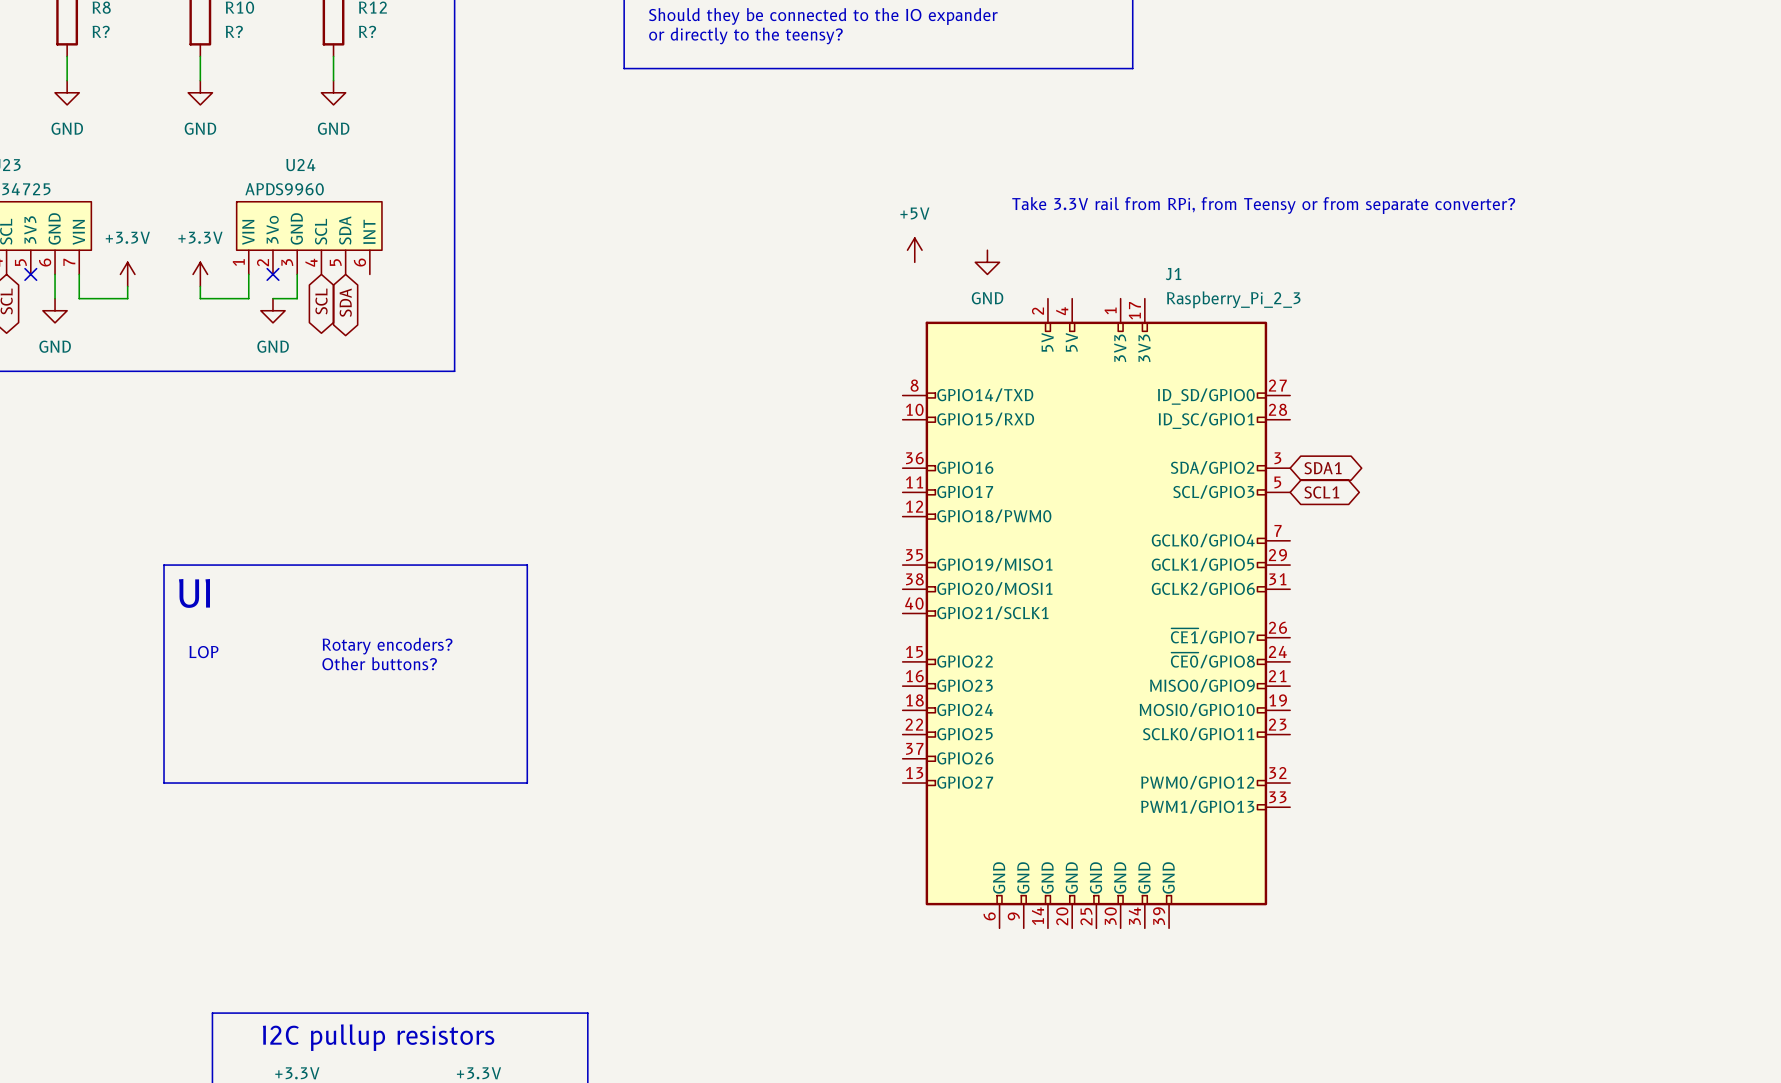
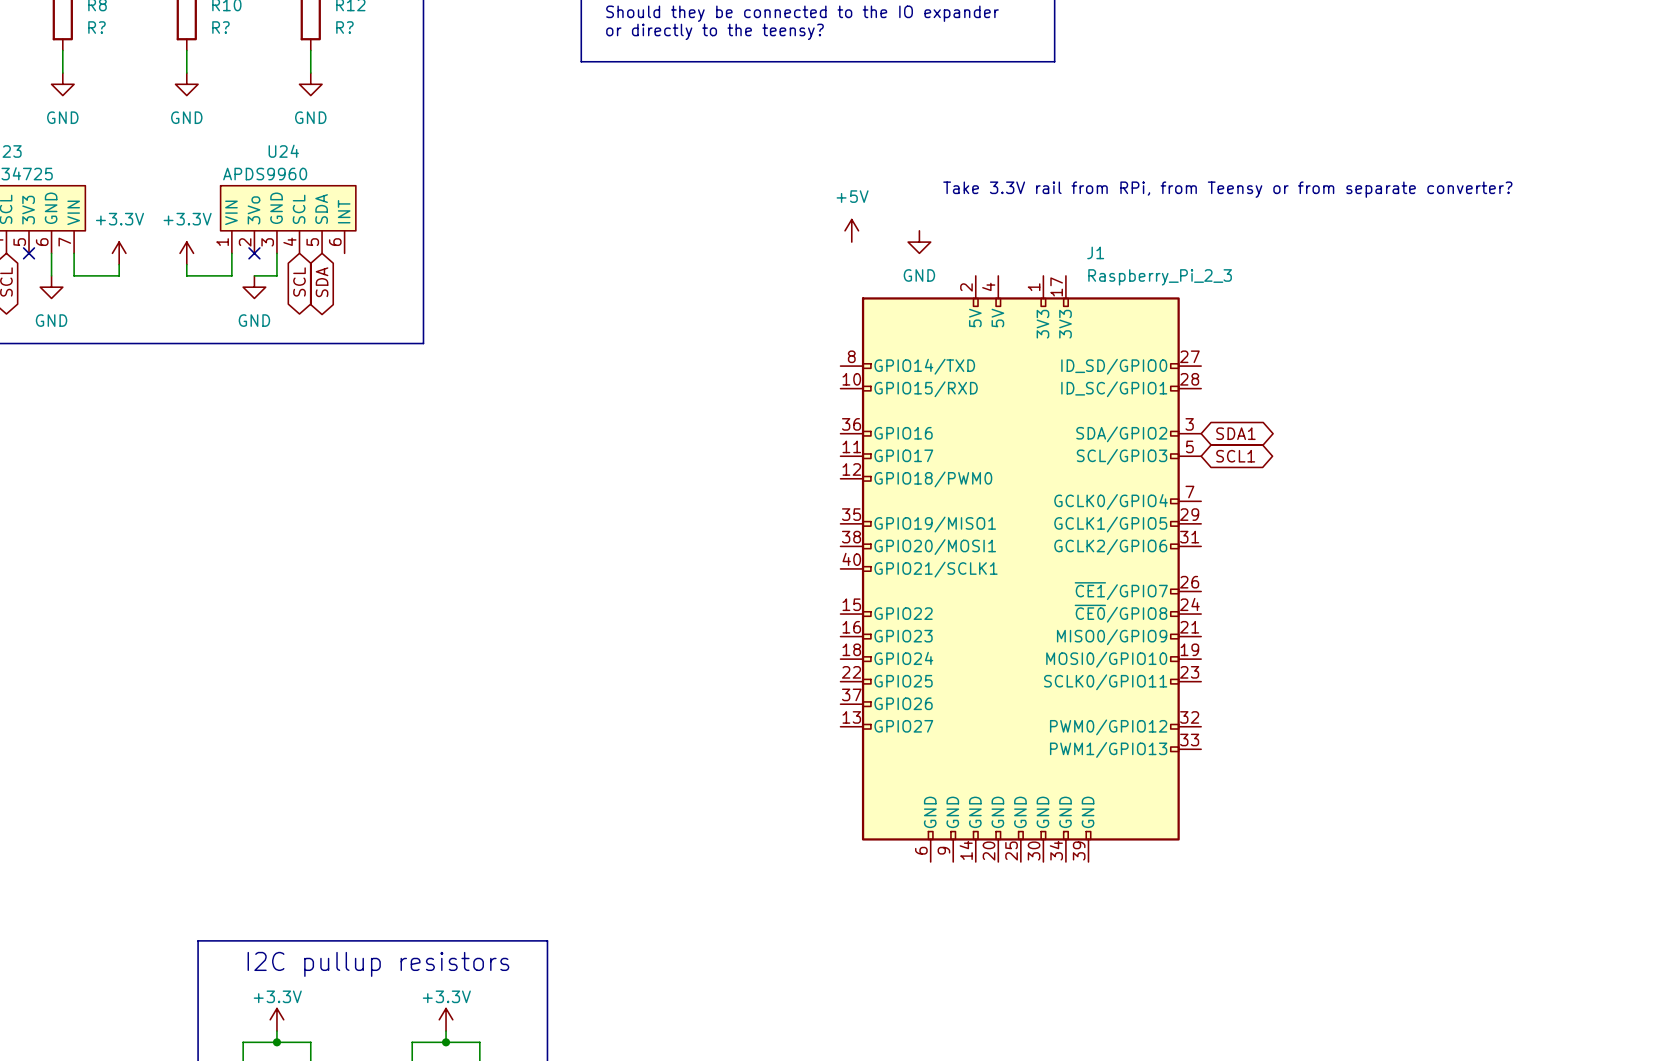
line: (164, 565) (527, 565) (527, 783) (164, 783) (164, 565) -> none
text: UI (194, 593) -> none
text: Rotary encoders? (387, 646) -> none
text: LOP (203, 652) -> none
text: Other buttons? (379, 663) -> none

